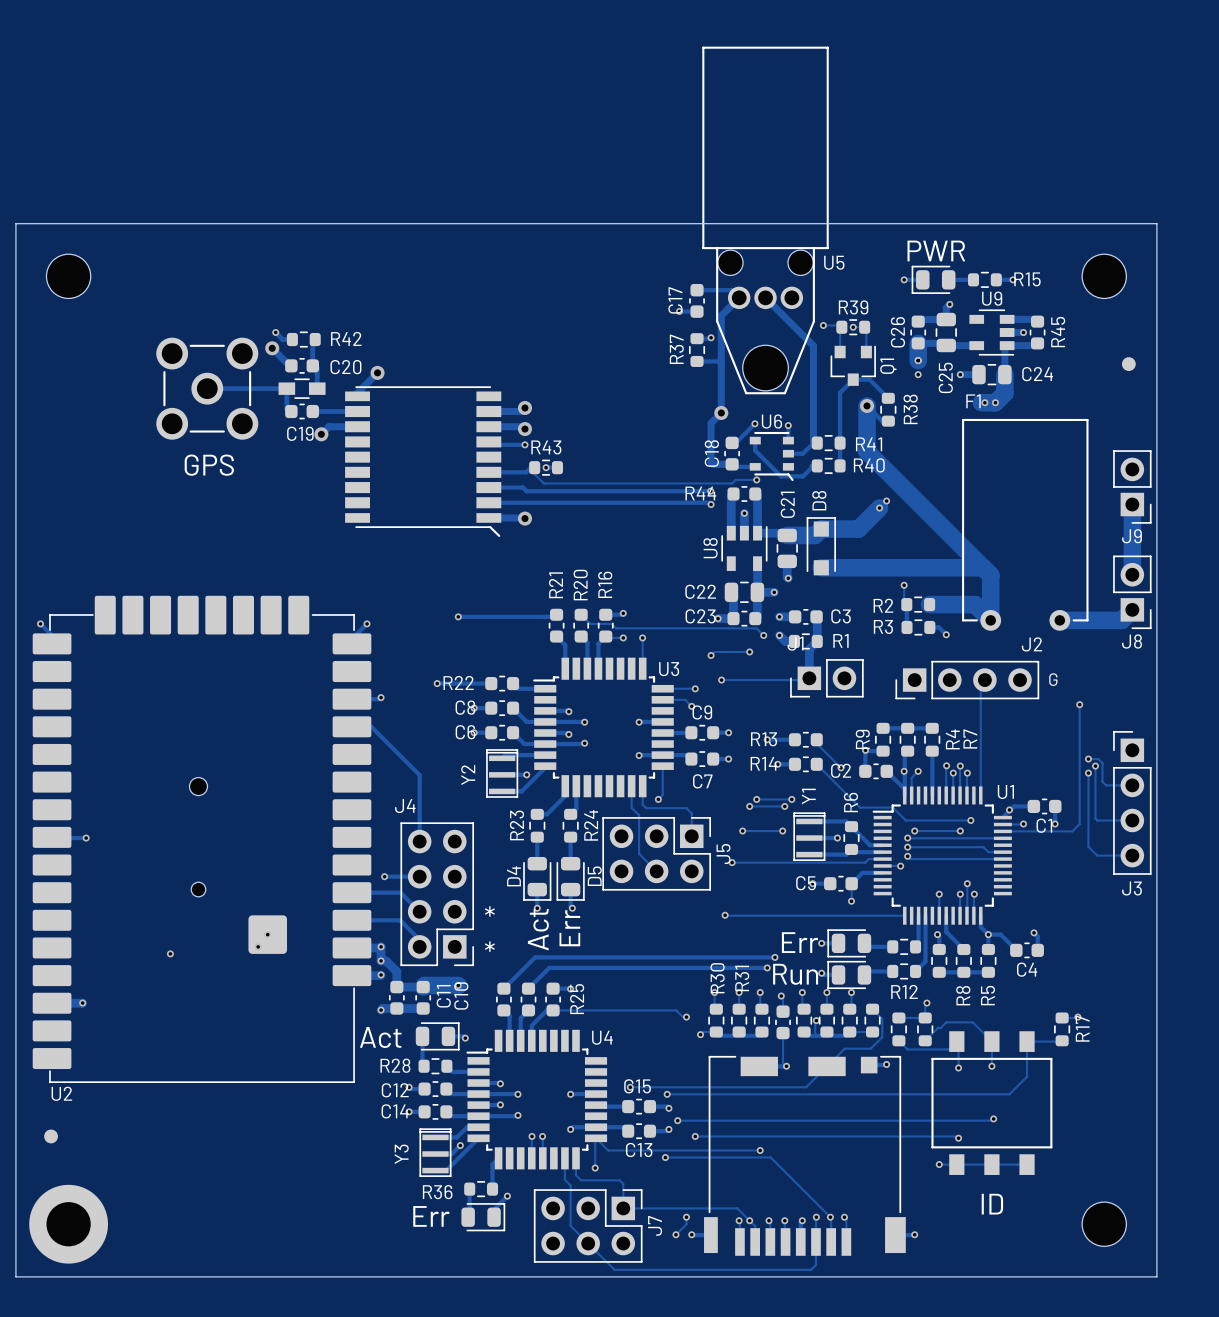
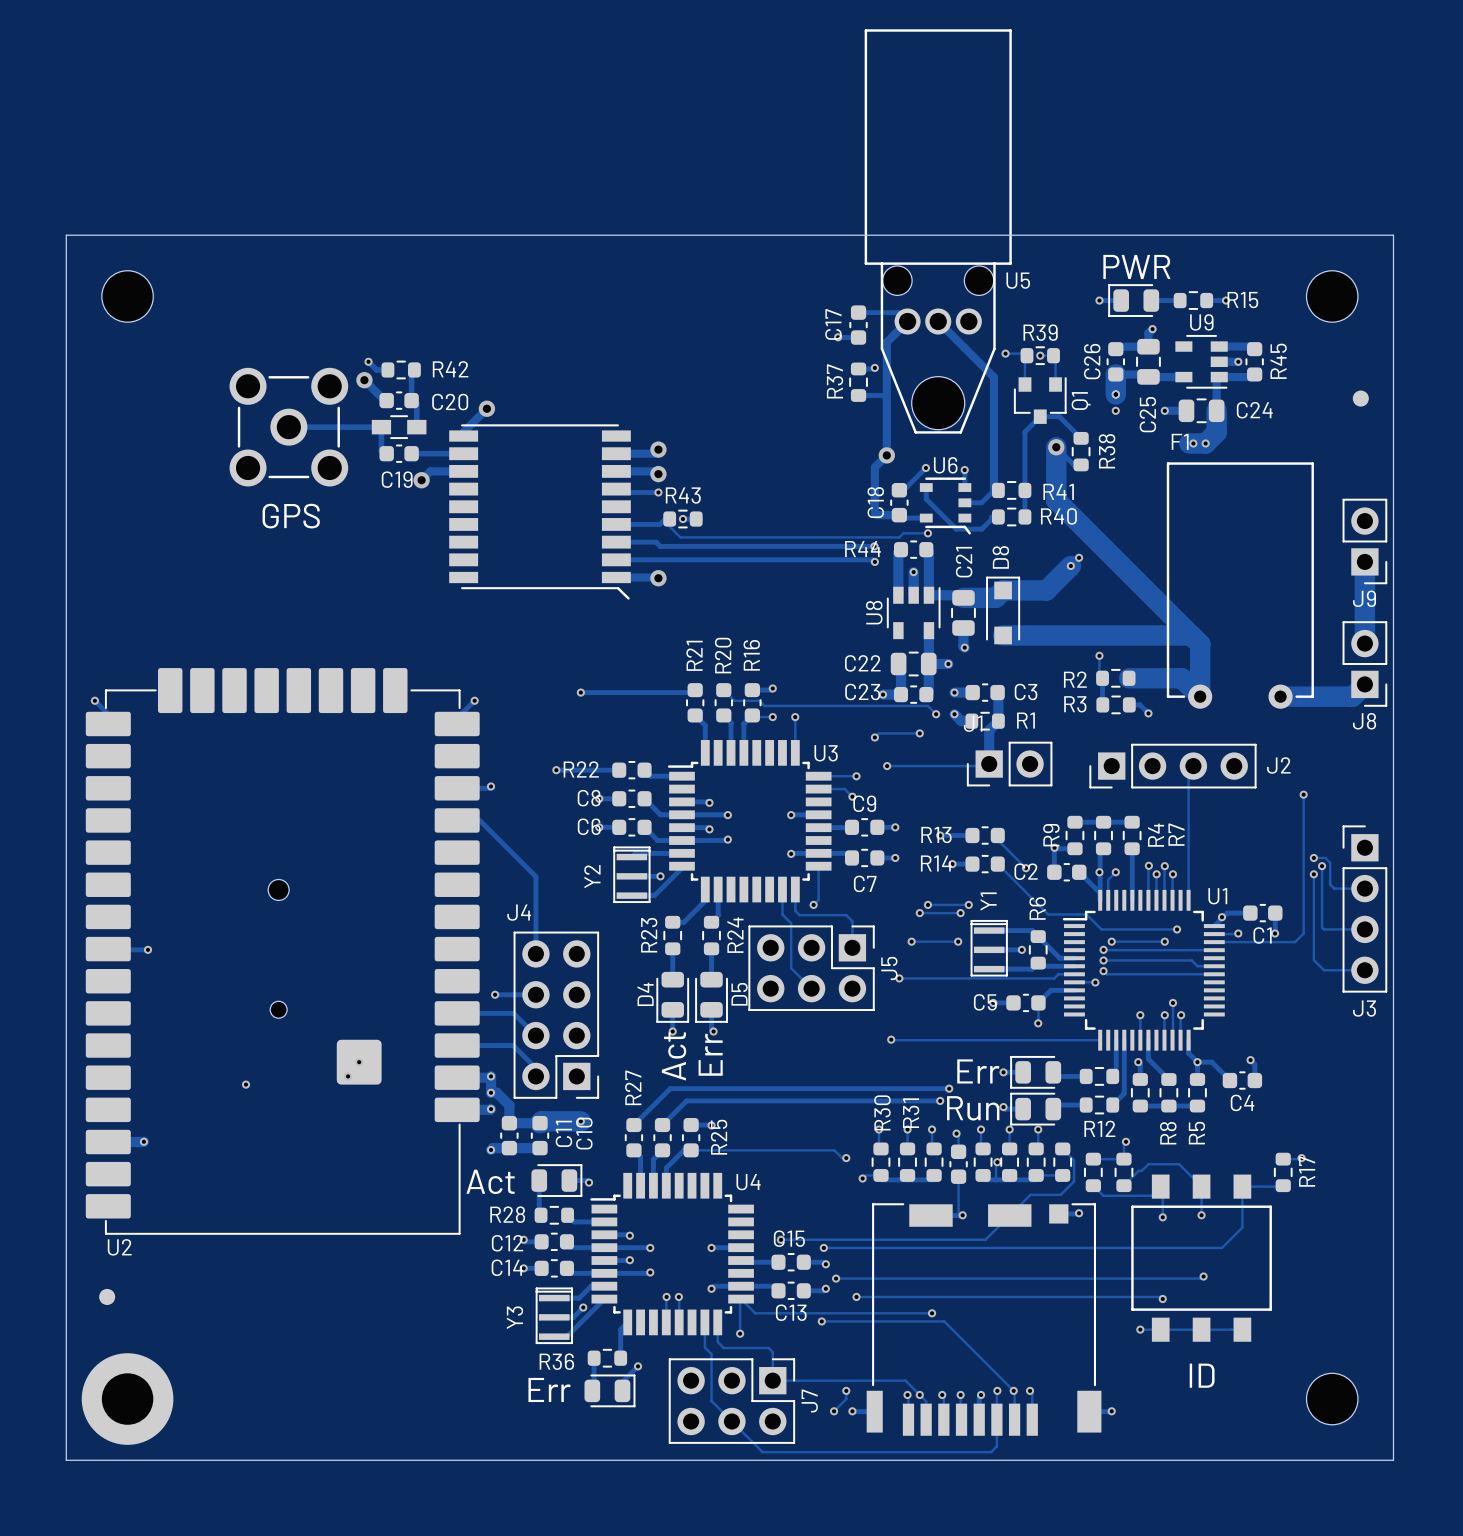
J2 name position: J2 (1032, 644) -> J2 (1278, 765)
text: G (1053, 679) -> none
text: * (489, 911) -> none
text: * (489, 946) -> none
R27 name: none -> R27 (633, 1087)

